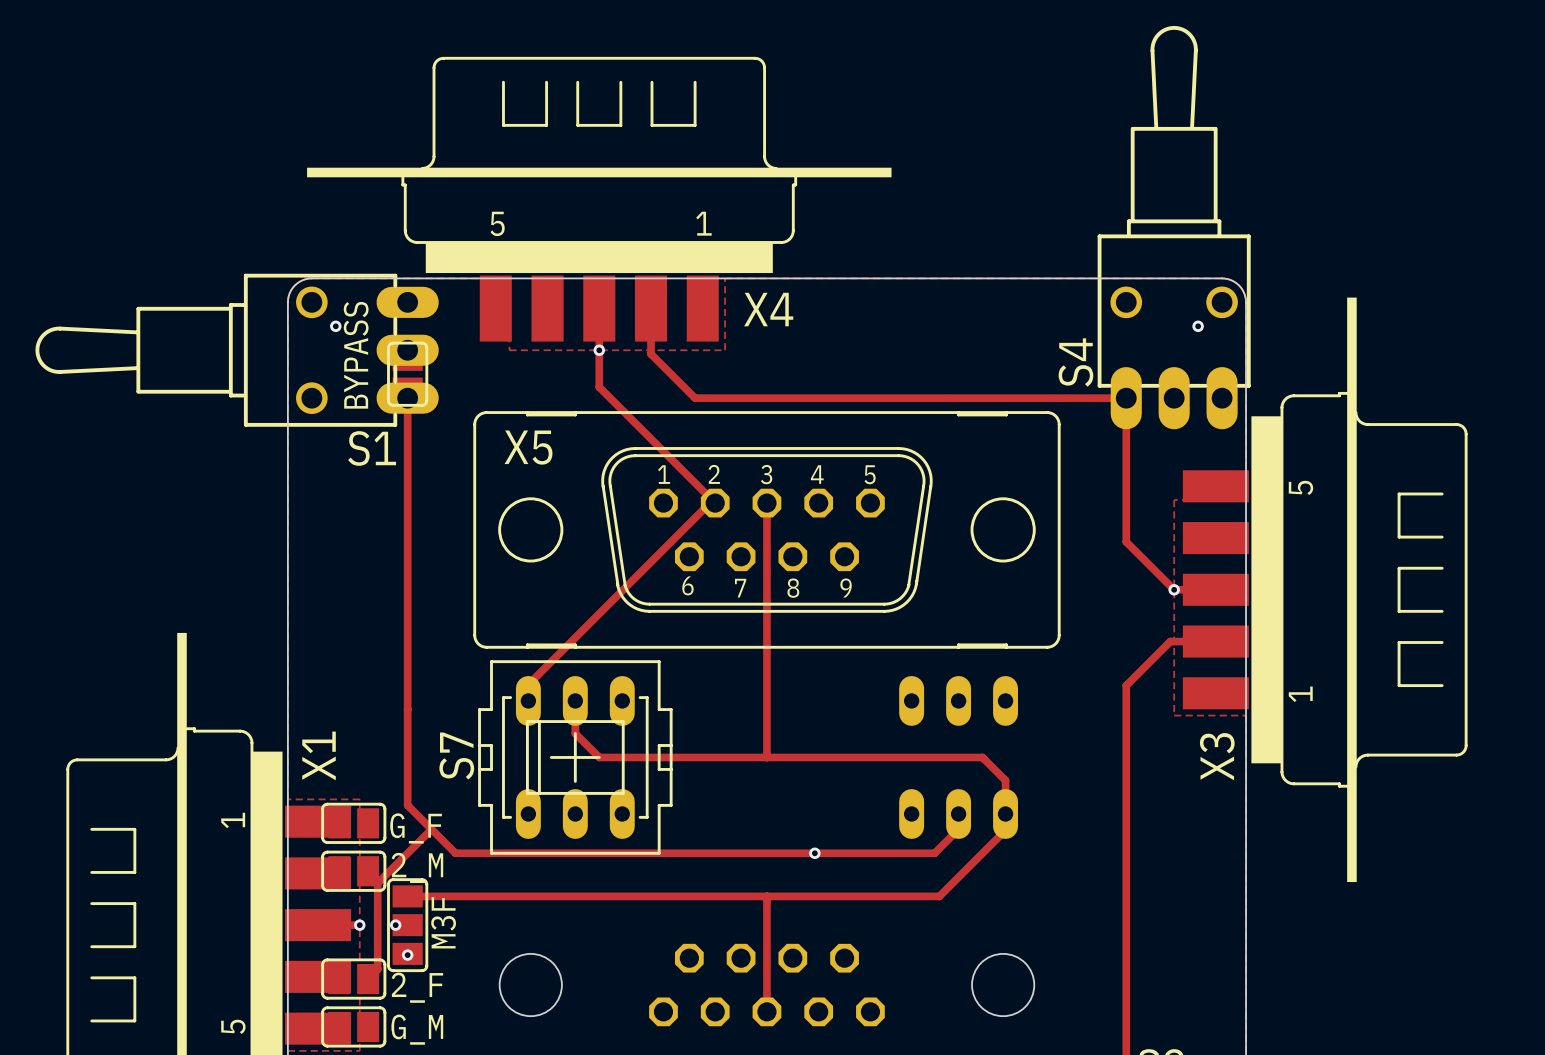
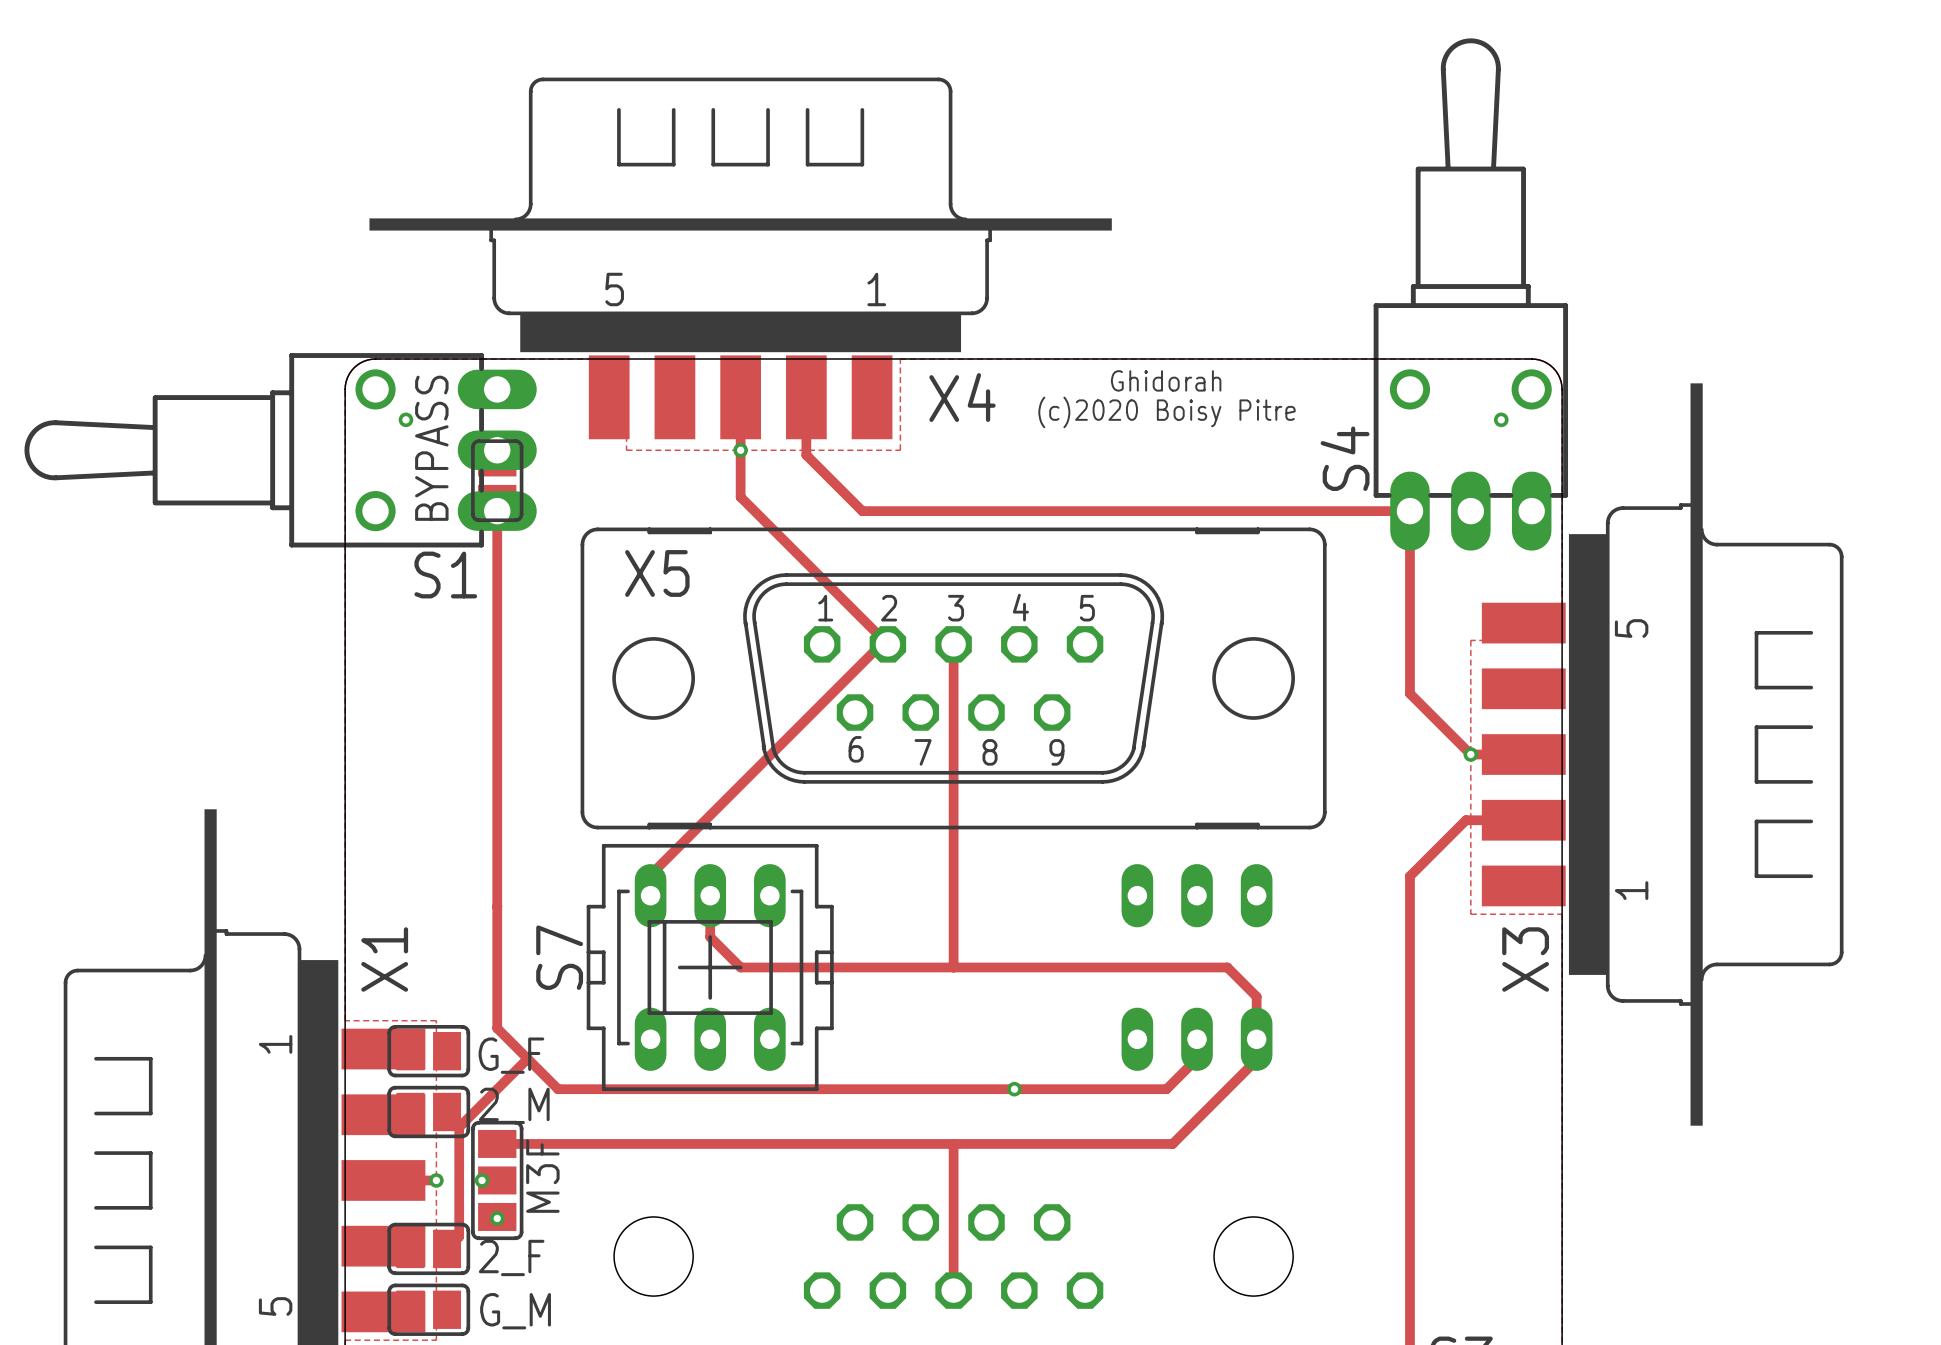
text: none -> Ghidorah (1166, 380)
text: none -> (c)2020 Boisy Pitre (1167, 412)

